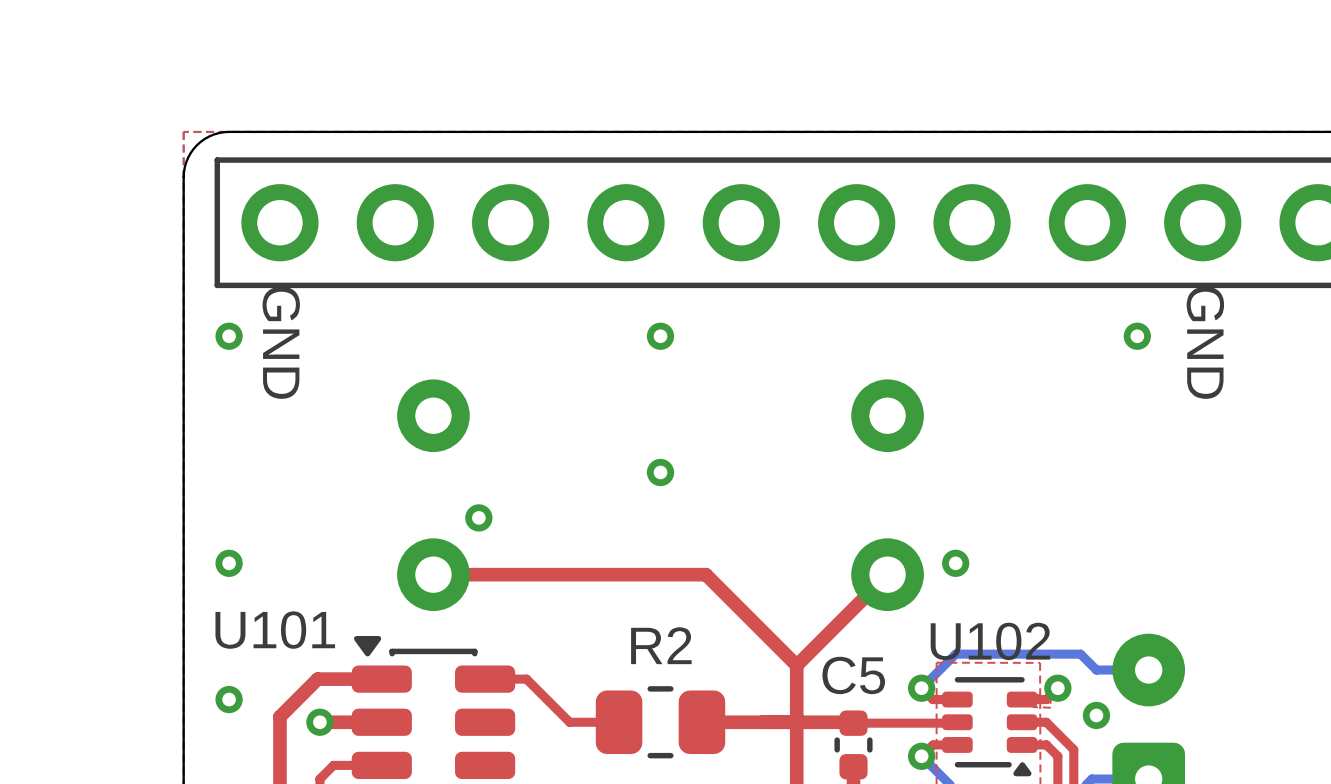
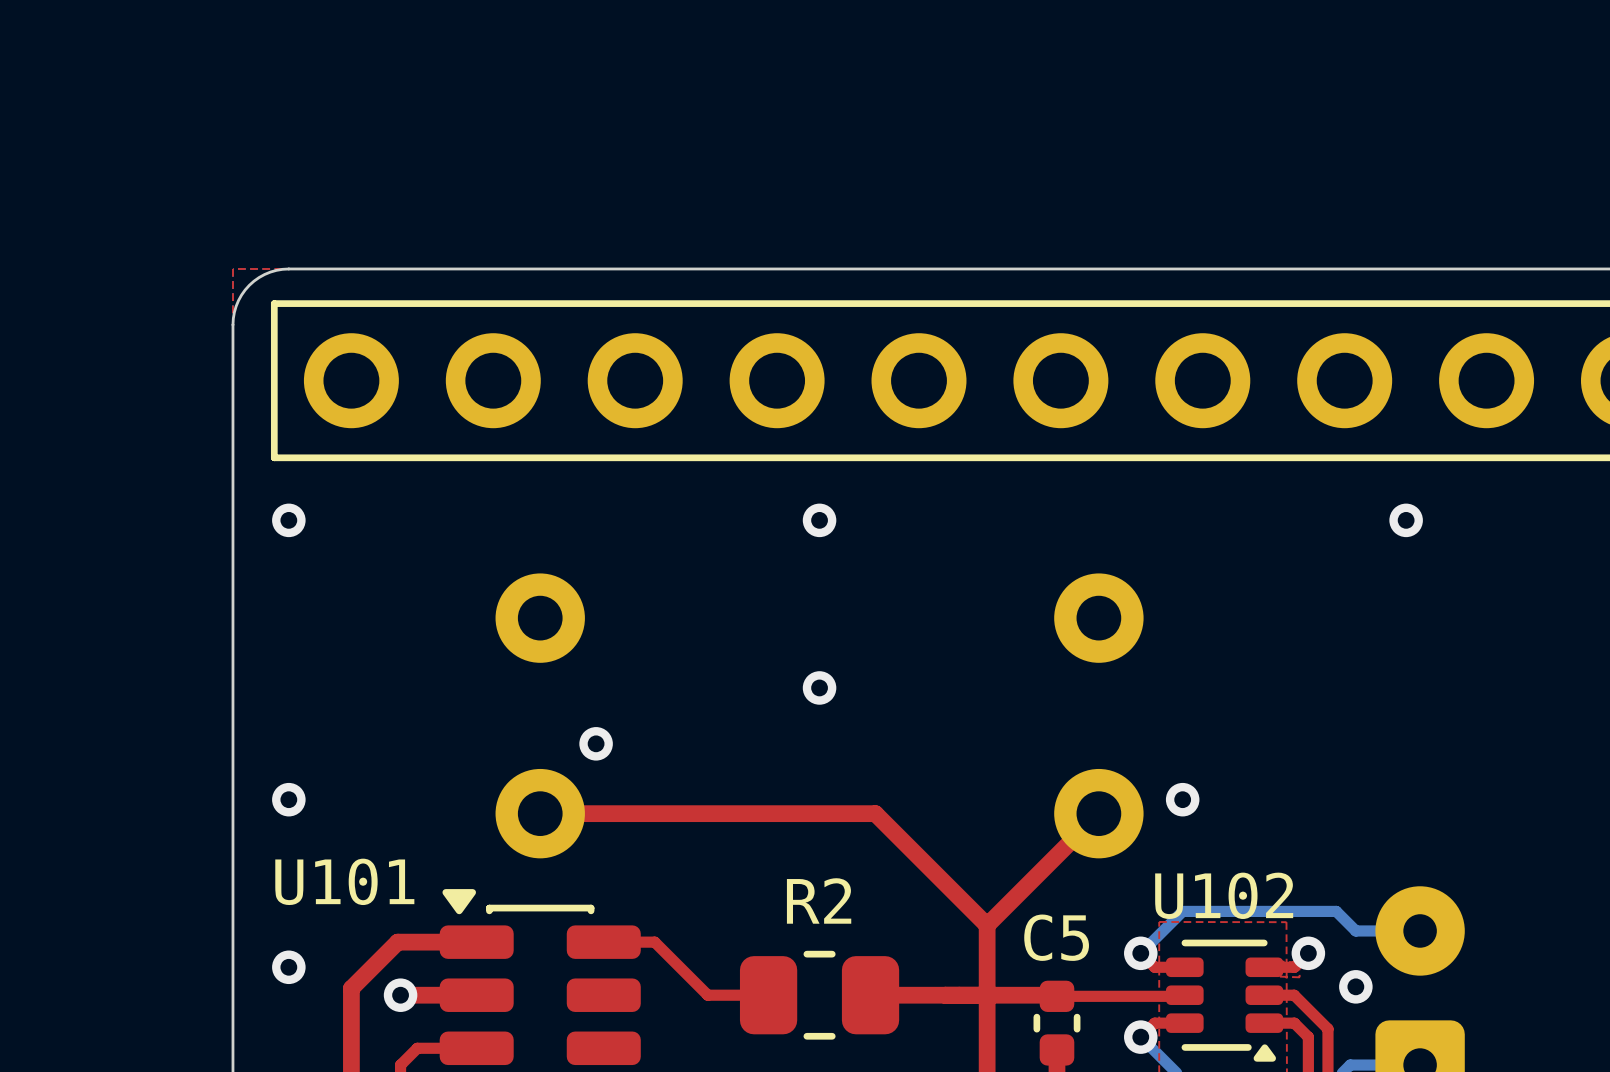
text: GND (281, 342) -> none
text: GND (1205, 342) -> none

